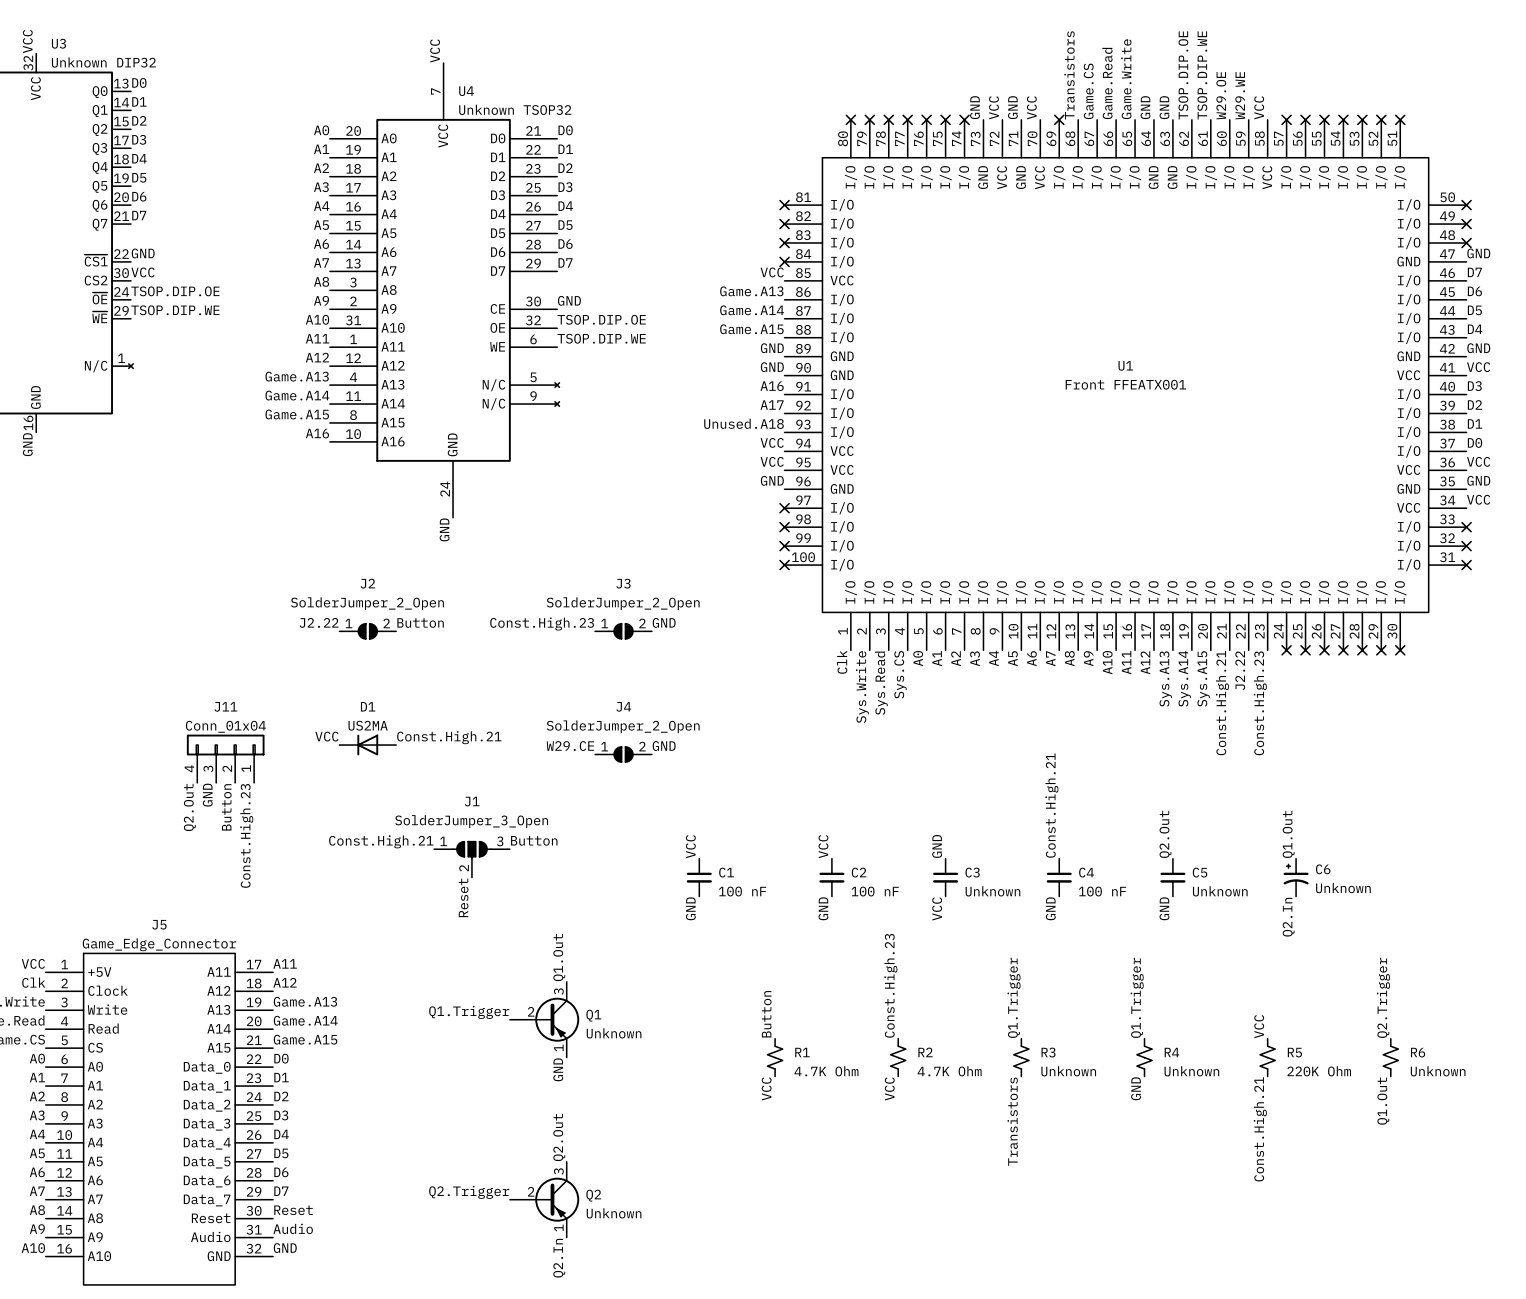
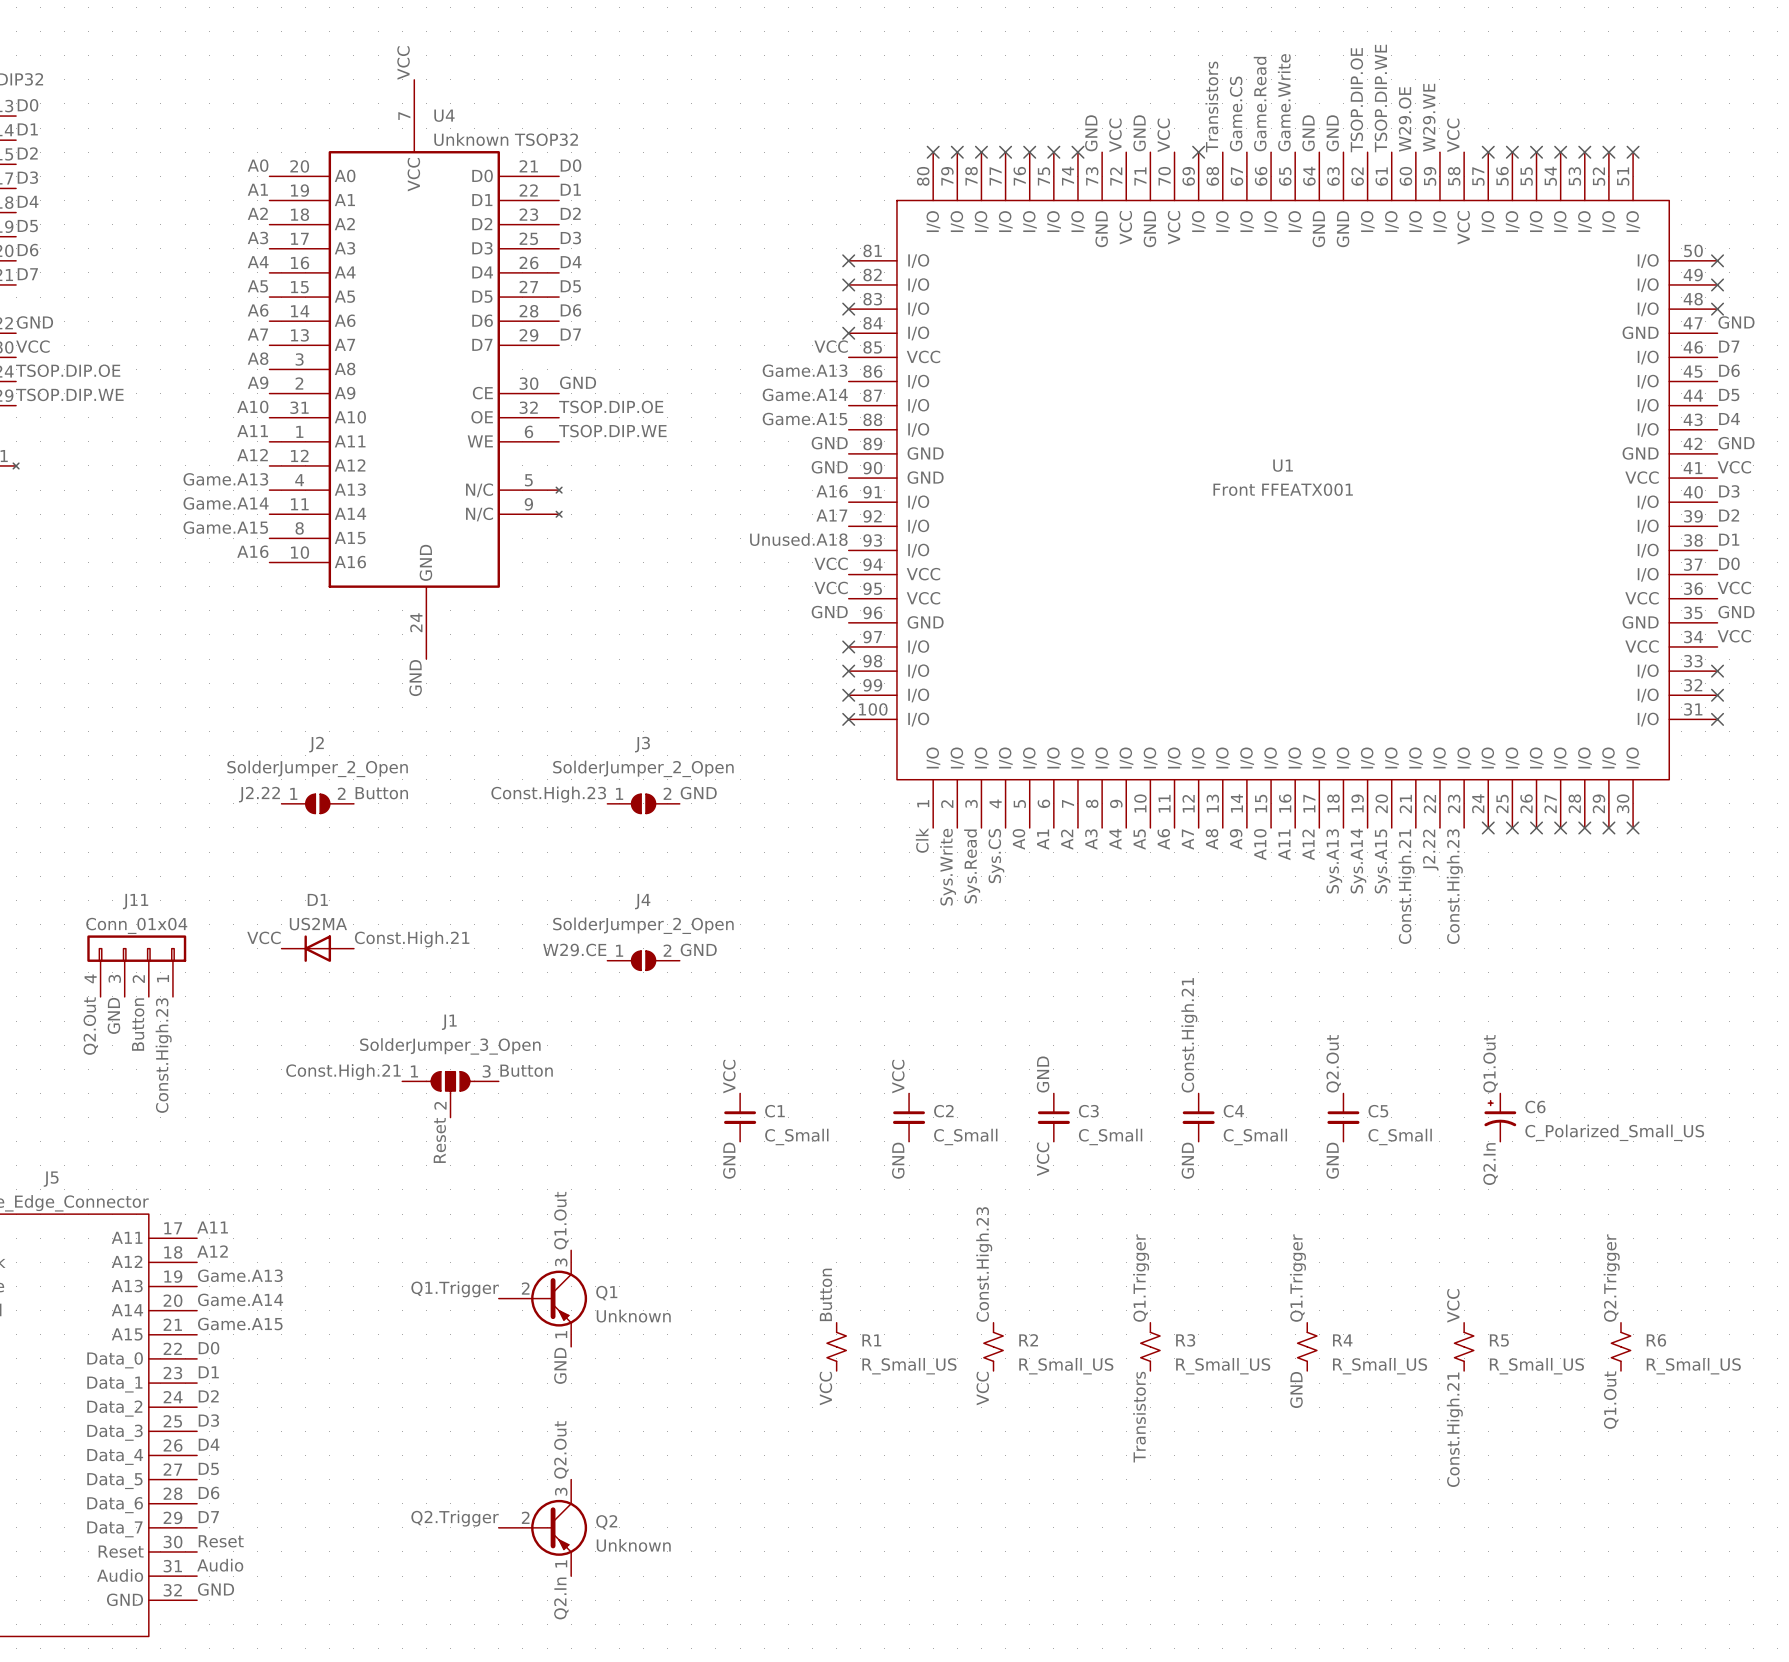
C6 value: Unknown (1343, 888) -> C_Polarized_Small_US (1614, 1132)
C1 value: 100 nF (742, 891) -> C_Small (796, 1136)
C2 value: 100 nF (875, 891) -> C_Small (965, 1136)
C3 value: Unknown (992, 891) -> C_Small (1110, 1136)
C4 value: 100 nF (1102, 891) -> C_Small (1255, 1136)
C5 value: Unknown (1220, 891) -> C_Small (1400, 1136)
R1 value: 4.7K Ohm (826, 1071) -> R_Small_US (909, 1366)
R2 value: 4.7K Ohm (949, 1071) -> R_Small_US (1066, 1366)
R3 value: Unknown (1068, 1071) -> R_Small_US (1223, 1366)
R4 value: Unknown (1191, 1071) -> R_Small_US (1380, 1366)
R5 value: 220K Ohm (1319, 1071) -> R_Small_US (1536, 1366)
R6 value: Unknown (1438, 1071) -> R_Small_US (1693, 1366)

